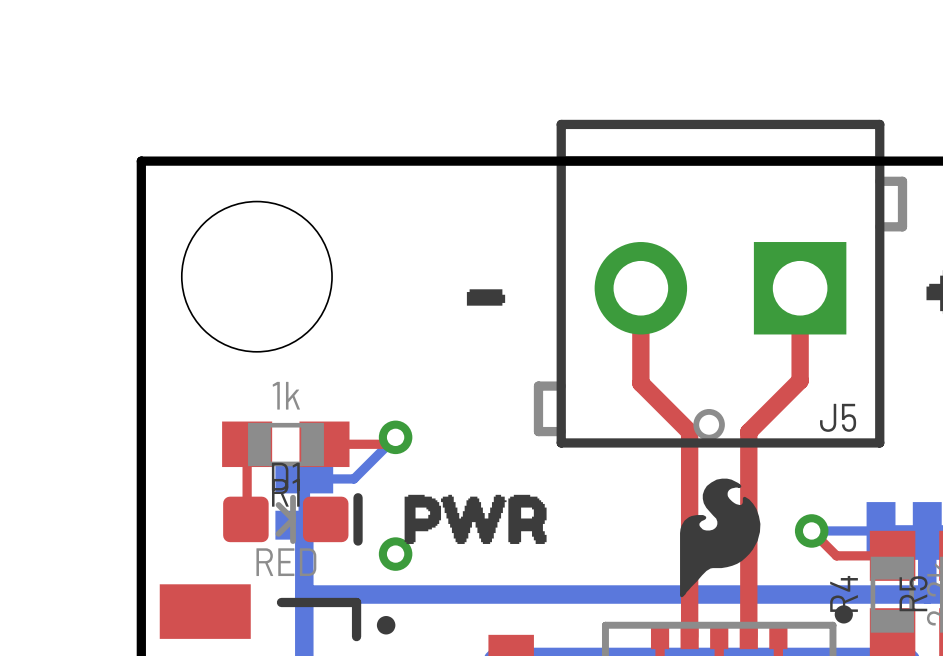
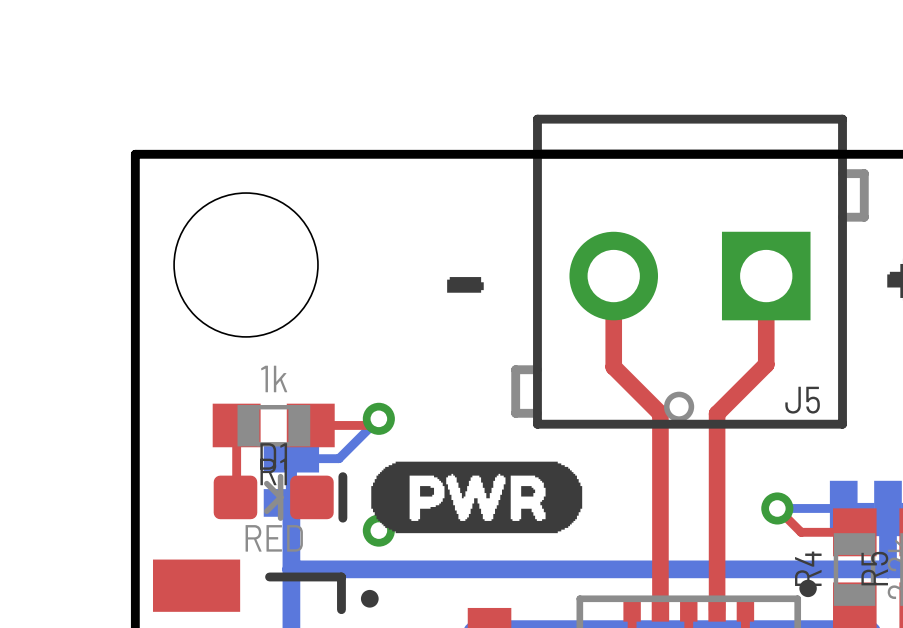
drawing: [680, 478, 761, 598] -> none
drawing shape: [404, 494, 547, 544] -> [371, 461, 583, 534]

